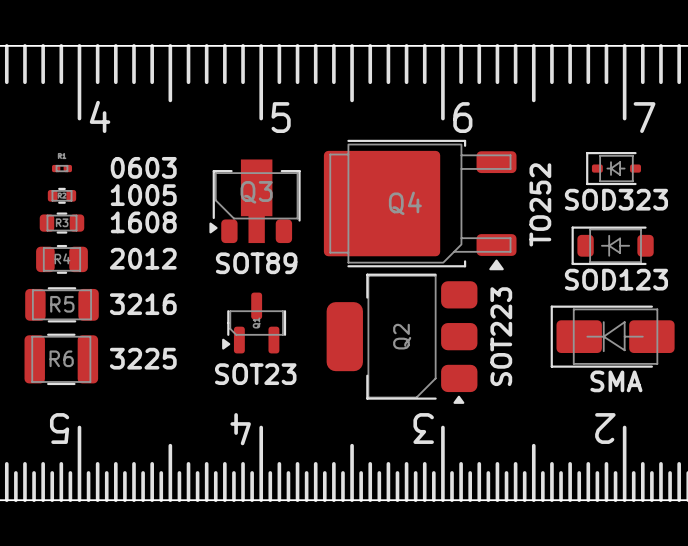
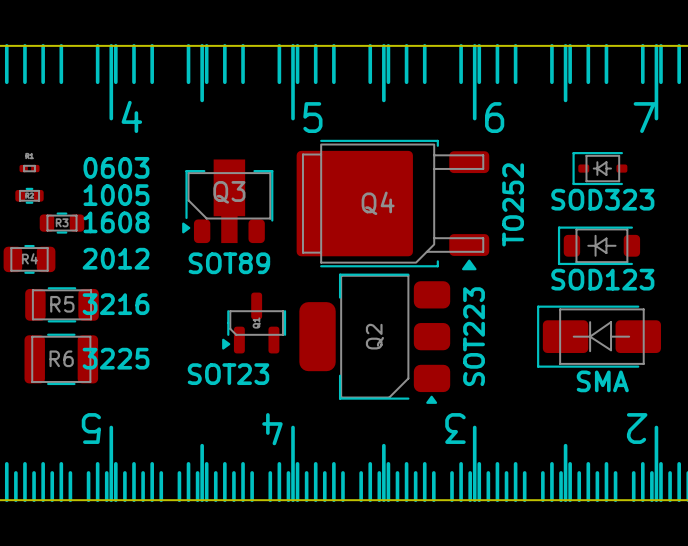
line: (79, 45) (79, 118) -> (111, 45) (111, 118)
line: (170, 45) (170, 100) -> (202, 45) (202, 100)
line: (261, 45) (261, 118) -> (293, 45) (293, 118)
line: (352, 45) (352, 100) -> (383, 45) (383, 100)
line: (442, 45) (442, 118) -> (474, 45) (474, 118)
line: (533, 45) (533, 100) -> (565, 45) (565, 100)
line: (624, 45) (624, 118) -> (656, 45) (656, 118)
text position: 4 (100, 116) -> 4 (131, 116)
text position: 5 (281, 117) -> 5 (312, 117)
text position: 6 (462, 117) -> 6 (494, 117)
text position: 0603 (143, 167) -> 0603 (116, 167)
part position: (61, 168) -> (29, 168)
part position: (613, 168) -> (599, 168)
part position: (61, 195) -> (29, 195)
text position: 1005 (143, 195) -> 1005 (116, 195)
text position: SOD323 (616, 199) -> SOD323 (602, 199)
Q3 position: (255, 201) -> (227, 201)
text position: TO252 (540, 204) -> TO252 (513, 204)
Q4 position: (420, 205) -> (392, 205)
text position: 1608 (143, 222) -> 1608 (116, 222)
part position: (612, 245) -> (599, 245)
text position: 2012 (143, 258) -> 2012 (116, 258)
R4 position: (61, 259) -> (29, 259)
text position: SOT89 (256, 263) -> SOT89 (229, 263)
text position: SOD123 (616, 279) -> SOD123 (602, 279)
text position: 3216 (143, 304) -> 3216 (116, 304)
text position: SOT223 (501, 336) -> SOT223 (474, 336)
part position: (612, 336) -> (599, 336)
Q2 position: (402, 338) -> (374, 338)
text position: 3225 (143, 358) -> 3225 (116, 358)
text position: SOT23 (255, 374) -> SOT23 (228, 374)
text position: SMA (616, 381) -> SMA (602, 381)
line: (79, 427) (79, 500) -> (111, 427) (111, 500)
line: (261, 427) (261, 500) -> (293, 427) (293, 500)
line: (442, 427) (442, 500) -> (474, 427) (474, 500)
line: (624, 427) (624, 500) -> (656, 427) (656, 500)
text position: 5 (59, 428) -> 5 (91, 428)
text position: 3 (423, 428) -> 3 (455, 428)
text position: 2 (605, 428) -> 2 (637, 428)
text position: 4 (240, 429) -> 4 (272, 429)
line: (170, 445) (170, 500) -> (202, 445) (202, 500)
line: (352, 445) (352, 500) -> (383, 445) (383, 500)
line: (533, 445) (533, 500) -> (565, 445) (565, 500)

